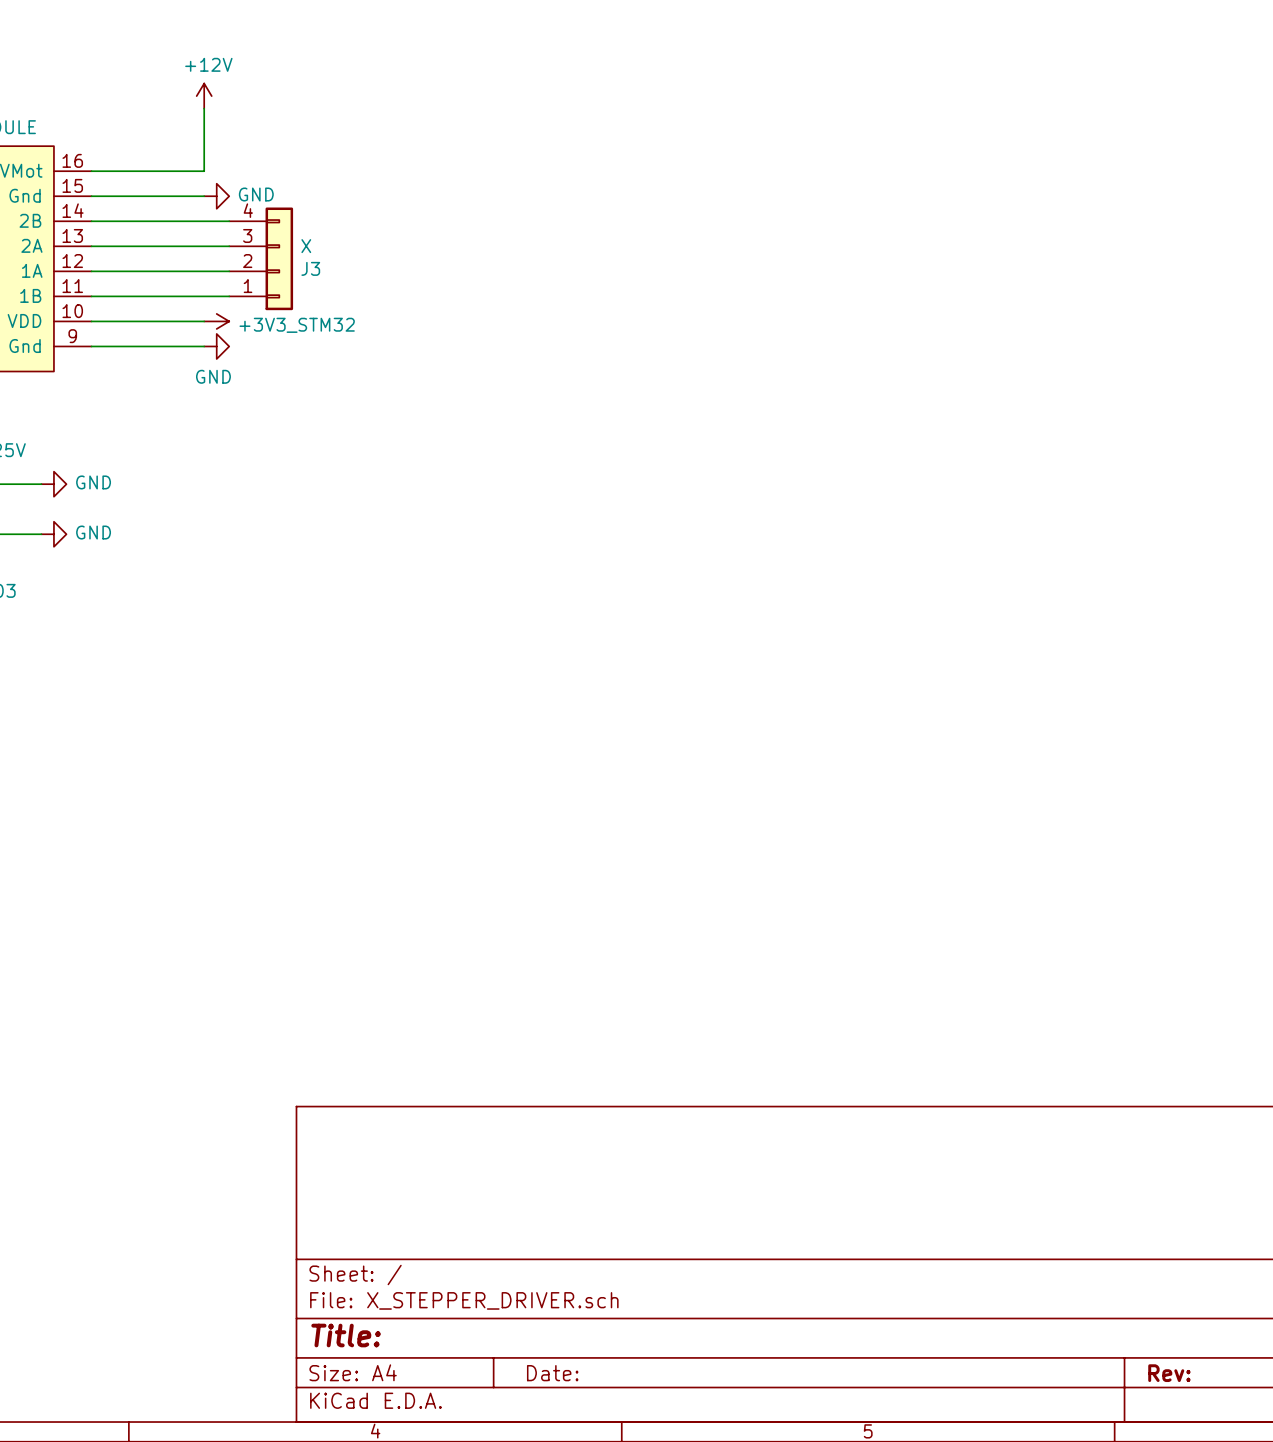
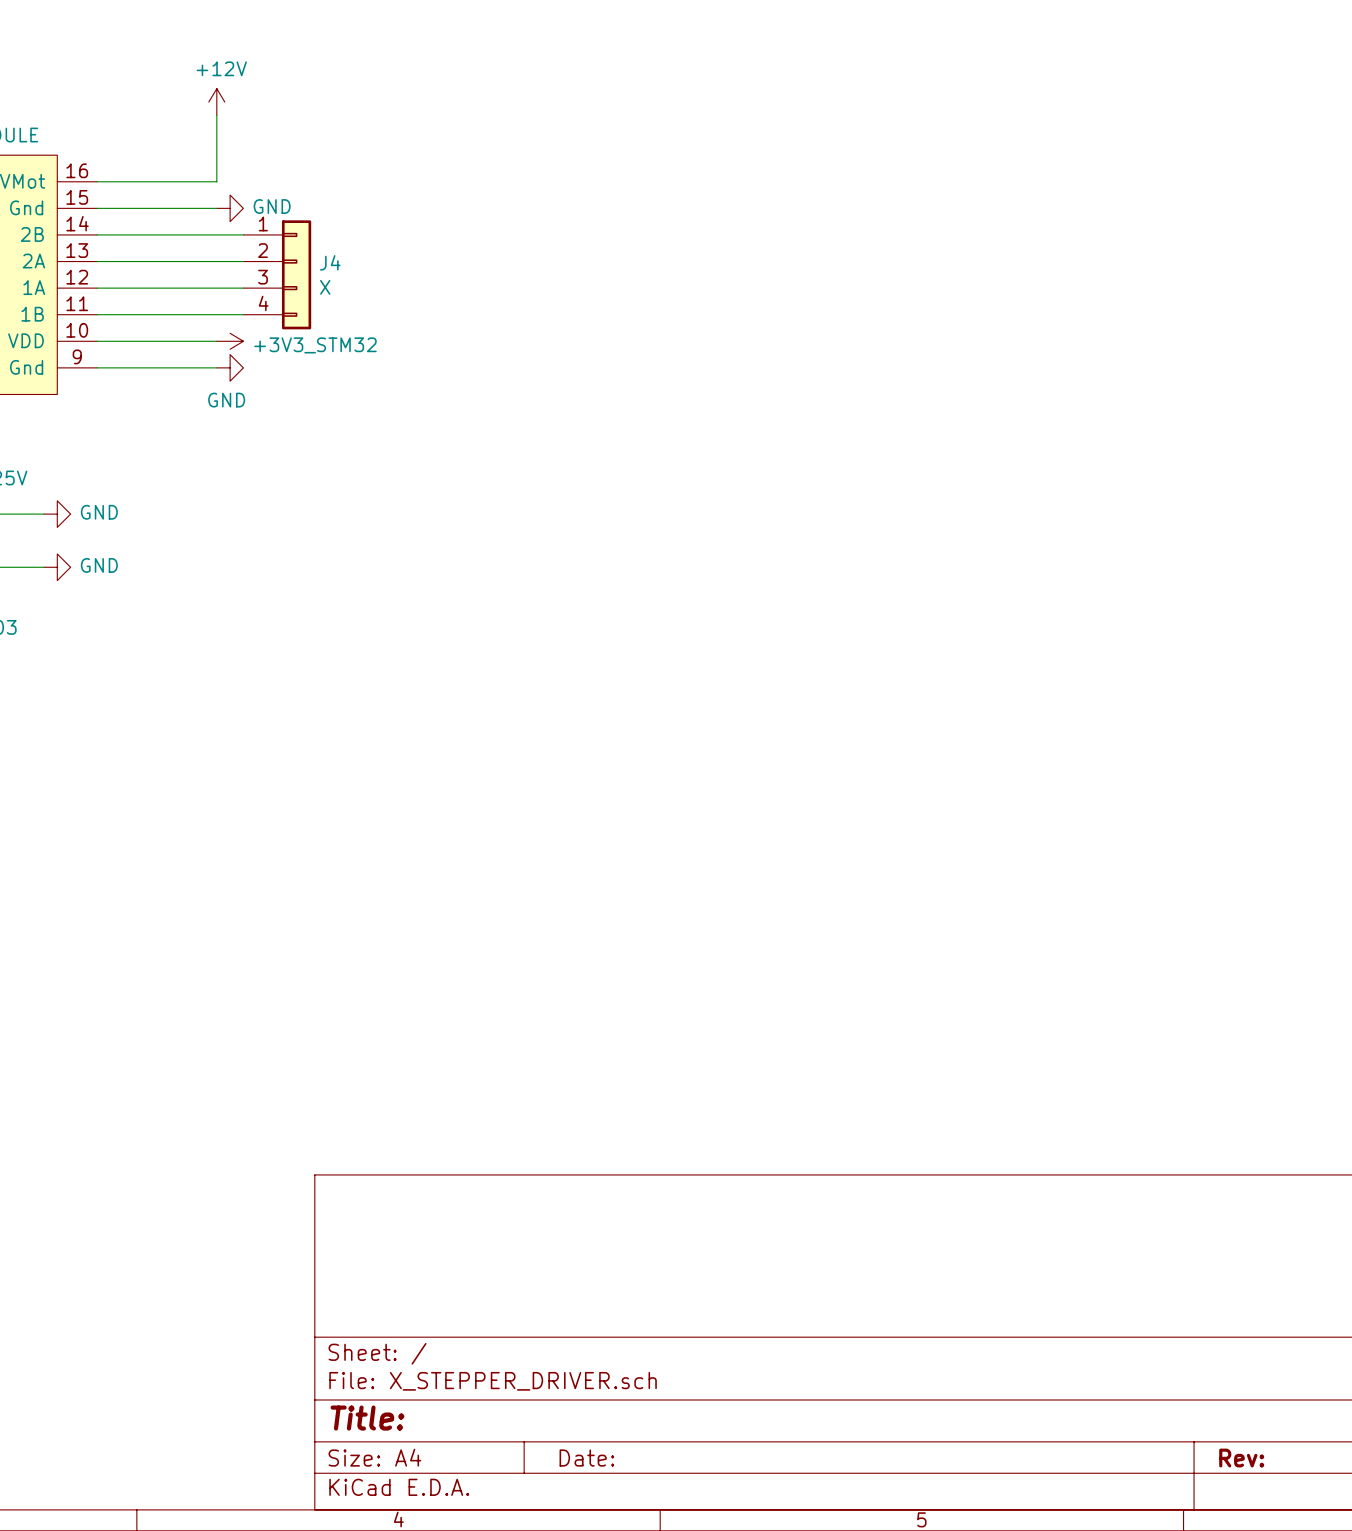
J3 flip: as is (279, 258) -> up-down (296, 274)
J3 name: J3 (310, 268) -> J4 (330, 262)

